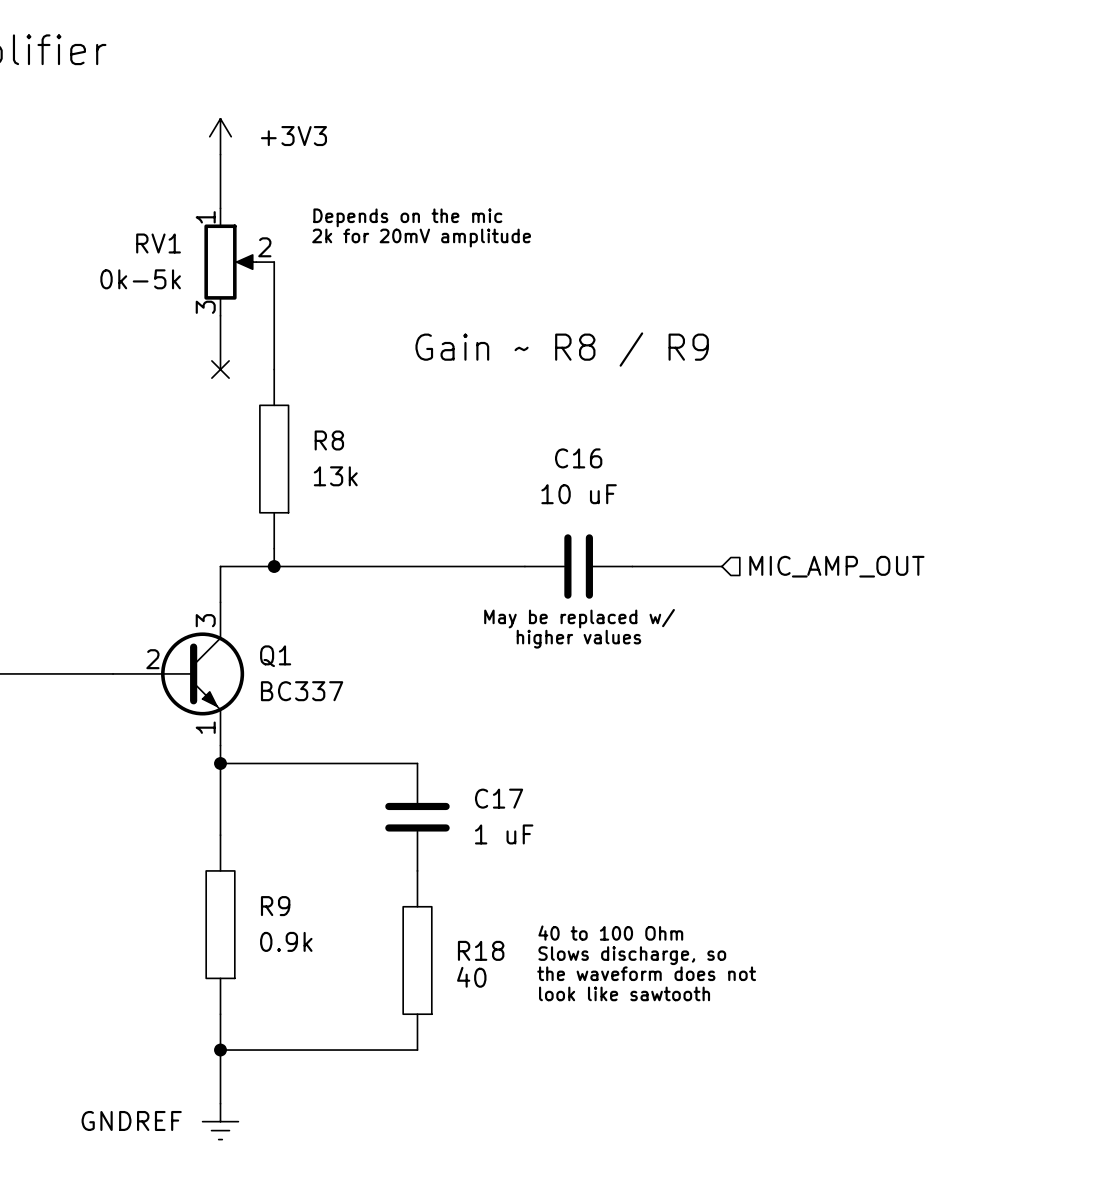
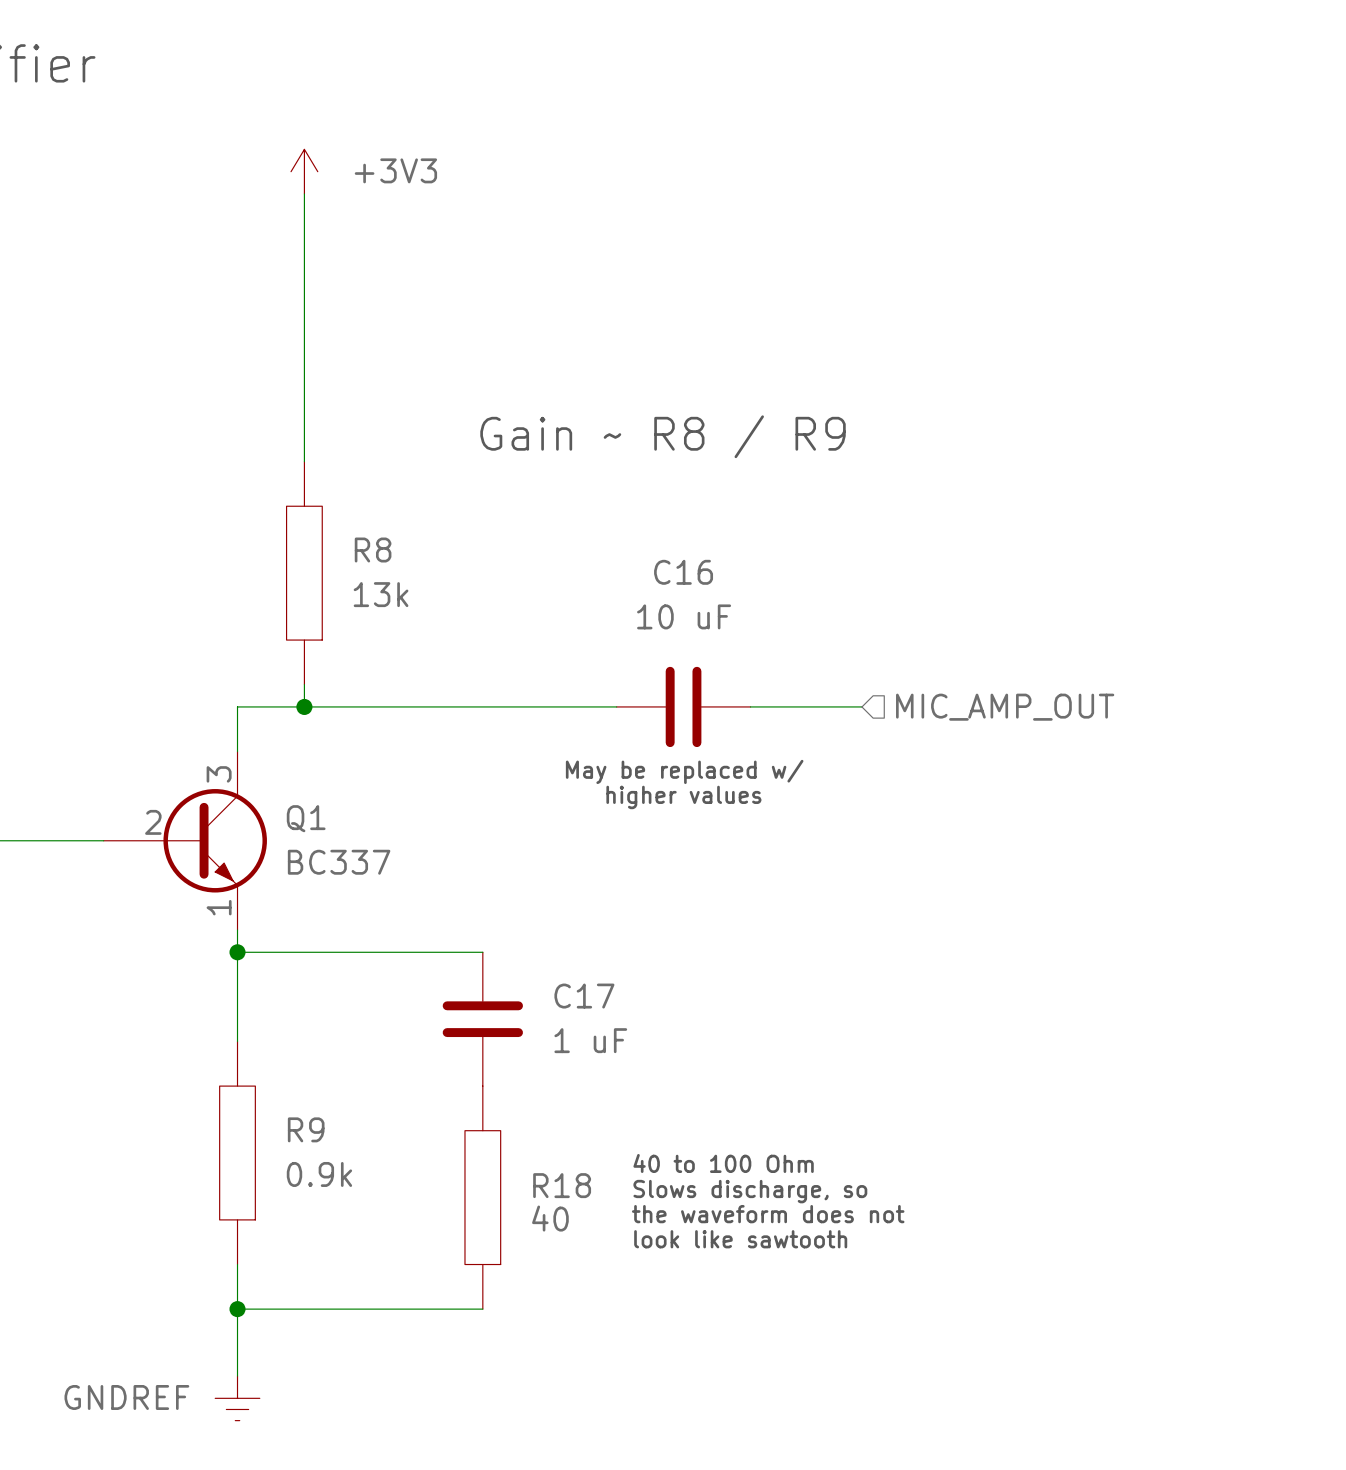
power symbol position: +3V3 (220, 136) -> +3V3 (304, 171)
wire: (220, 154) (220, 208) -> none
wire: none -> (304, 194) (304, 327)
text: Depends on the mic (407, 217) -> none
text: 2k for 20mV amplitude (421, 238) -> none
RV1: 0k-5k (239, 262) -> none
wire: (220, 315) (220, 369) -> none
no-connect mark: (220, 369) -> none

